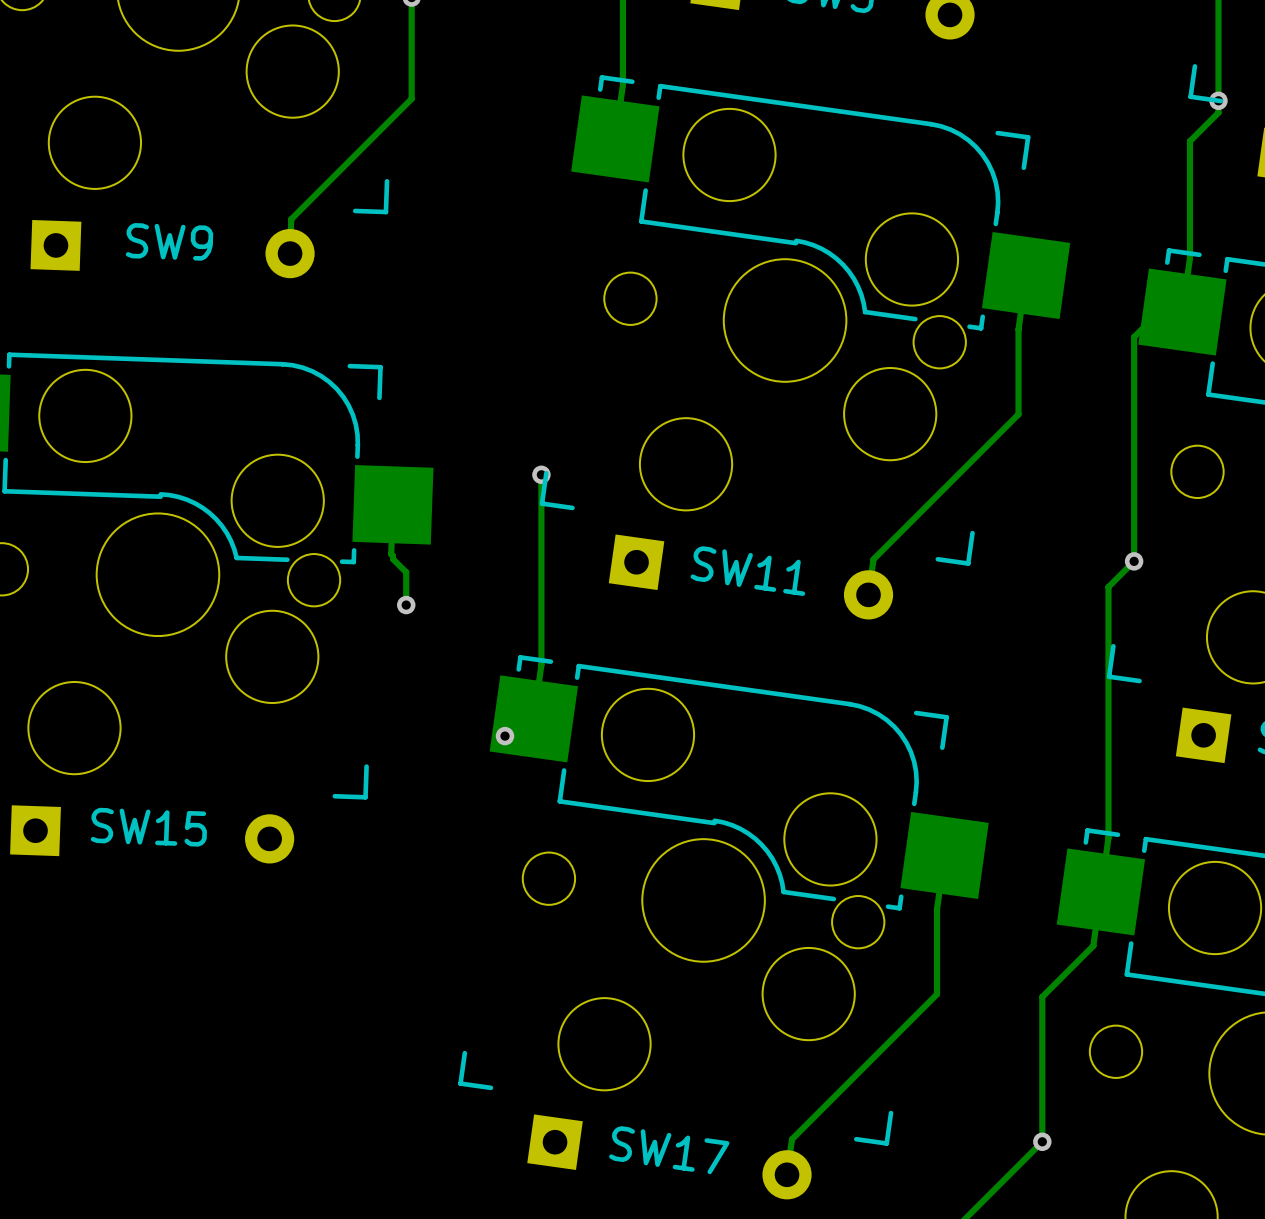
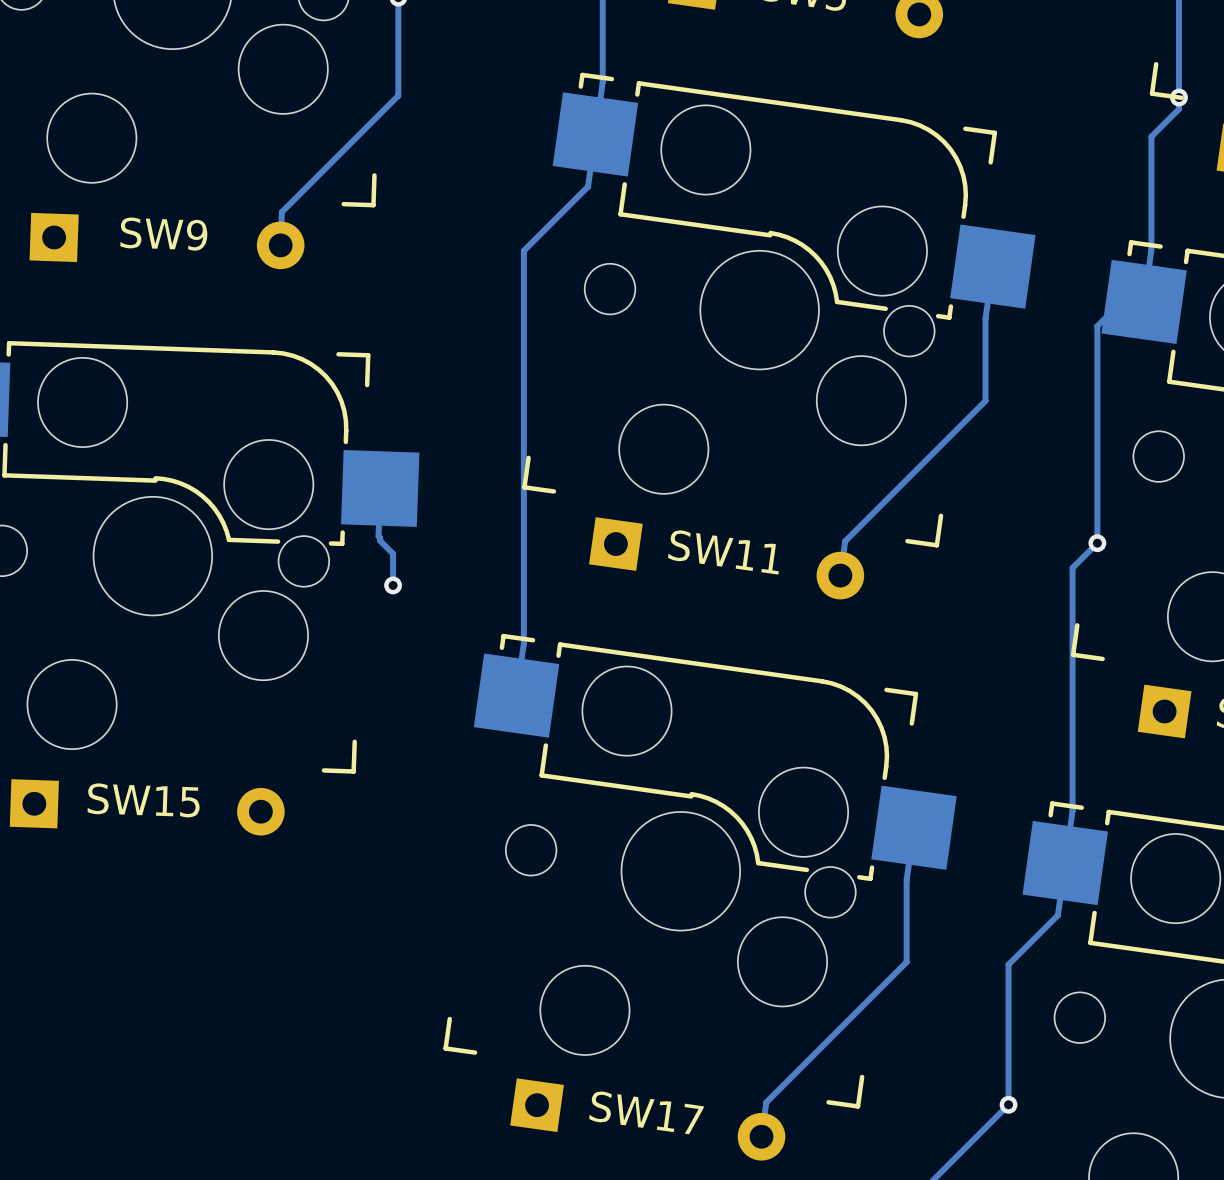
track: none -> (595, 134) (588, 186) (523, 250) (523, 459)
via: (541, 474) -> none
via: (505, 736) -> none

